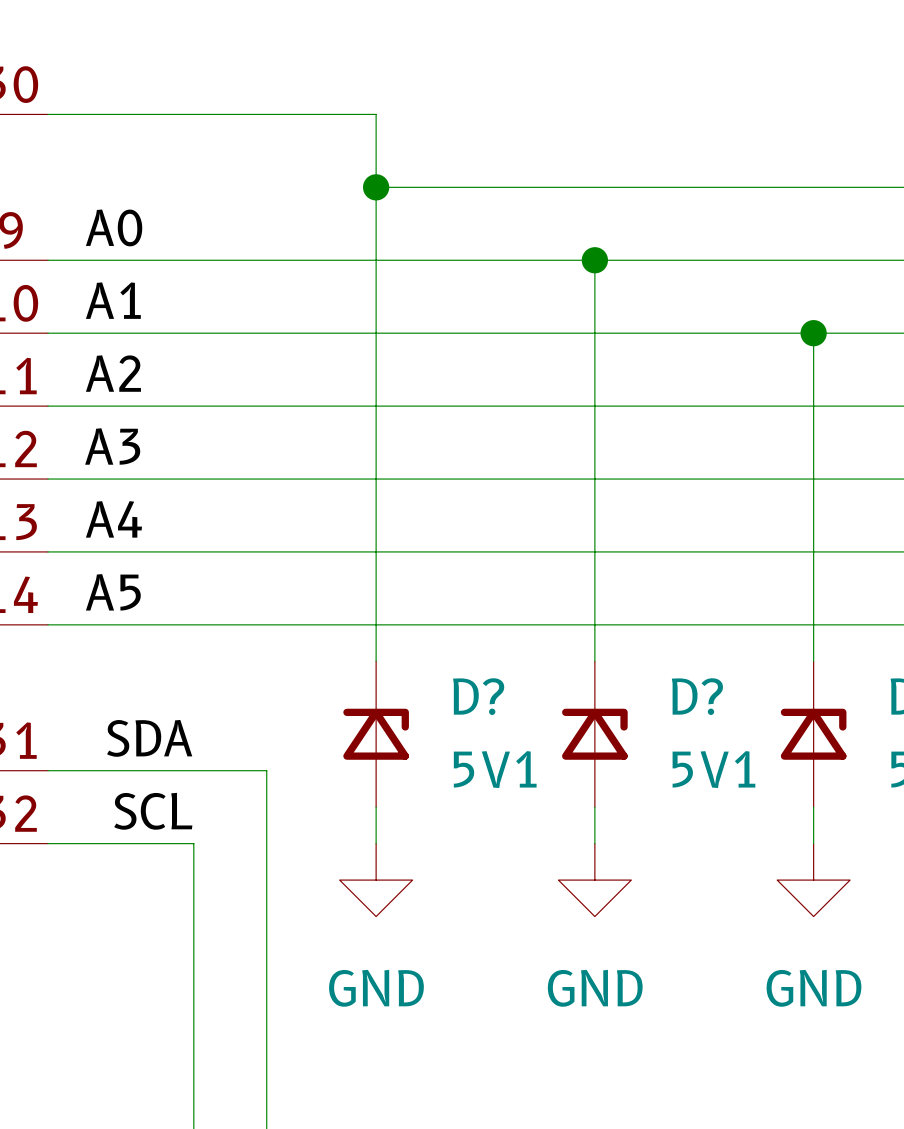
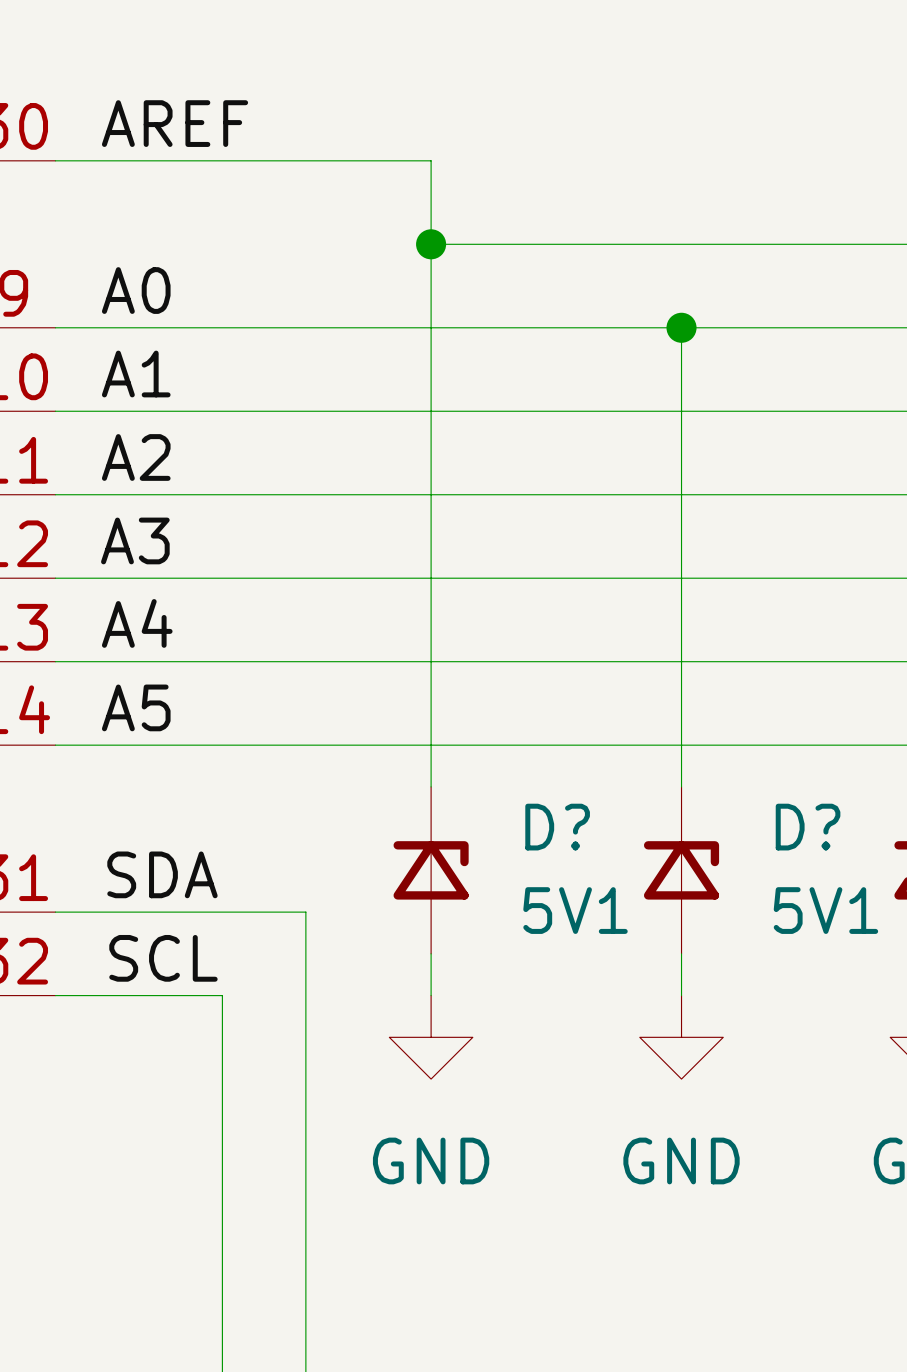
label: none -> AREF (175, 123)

